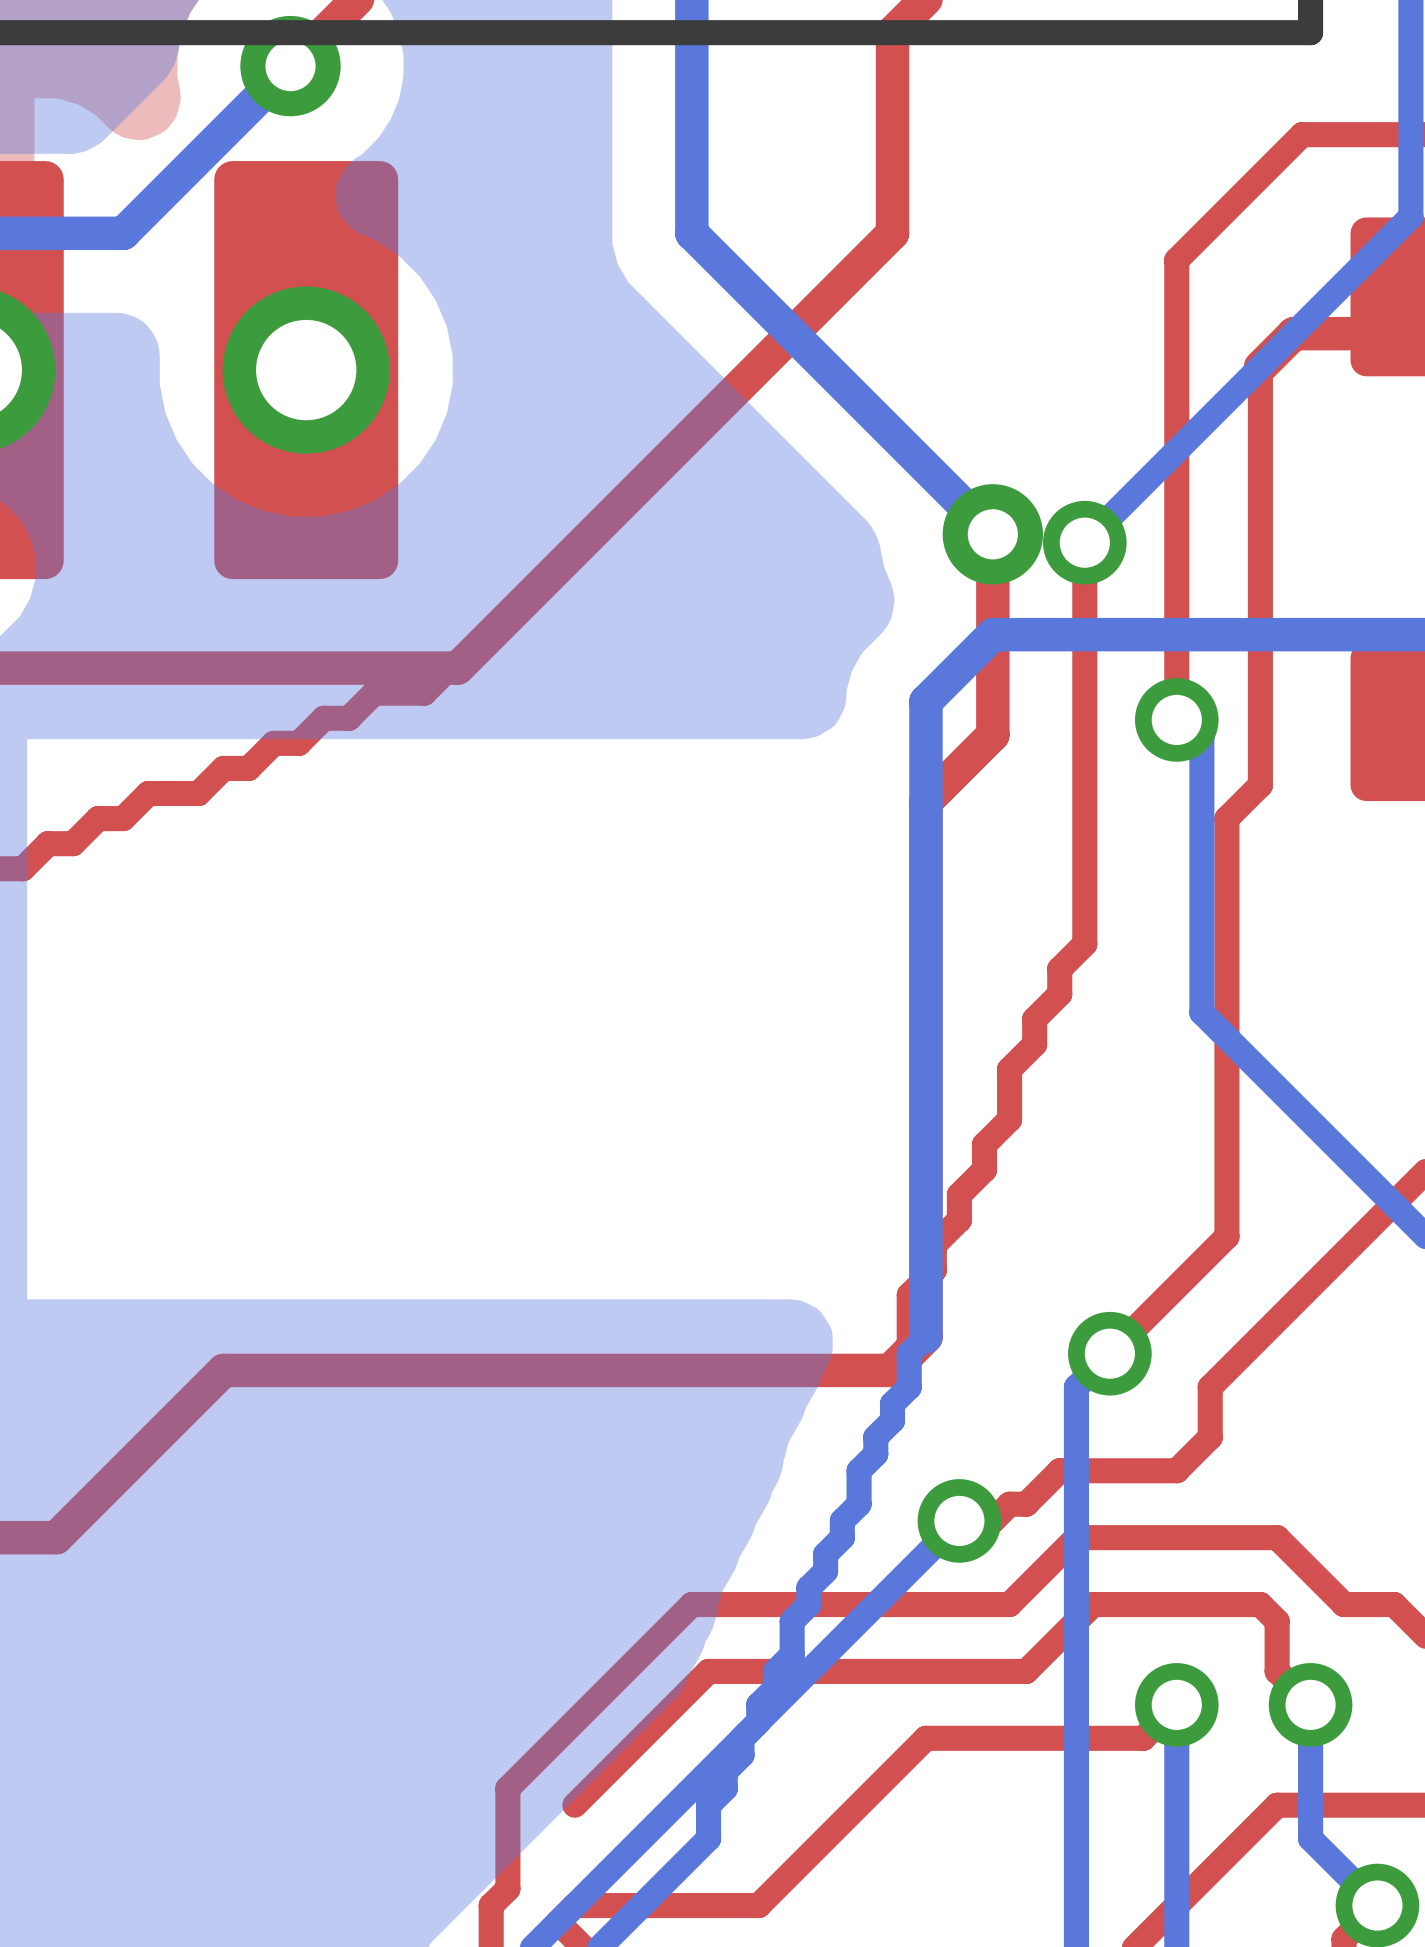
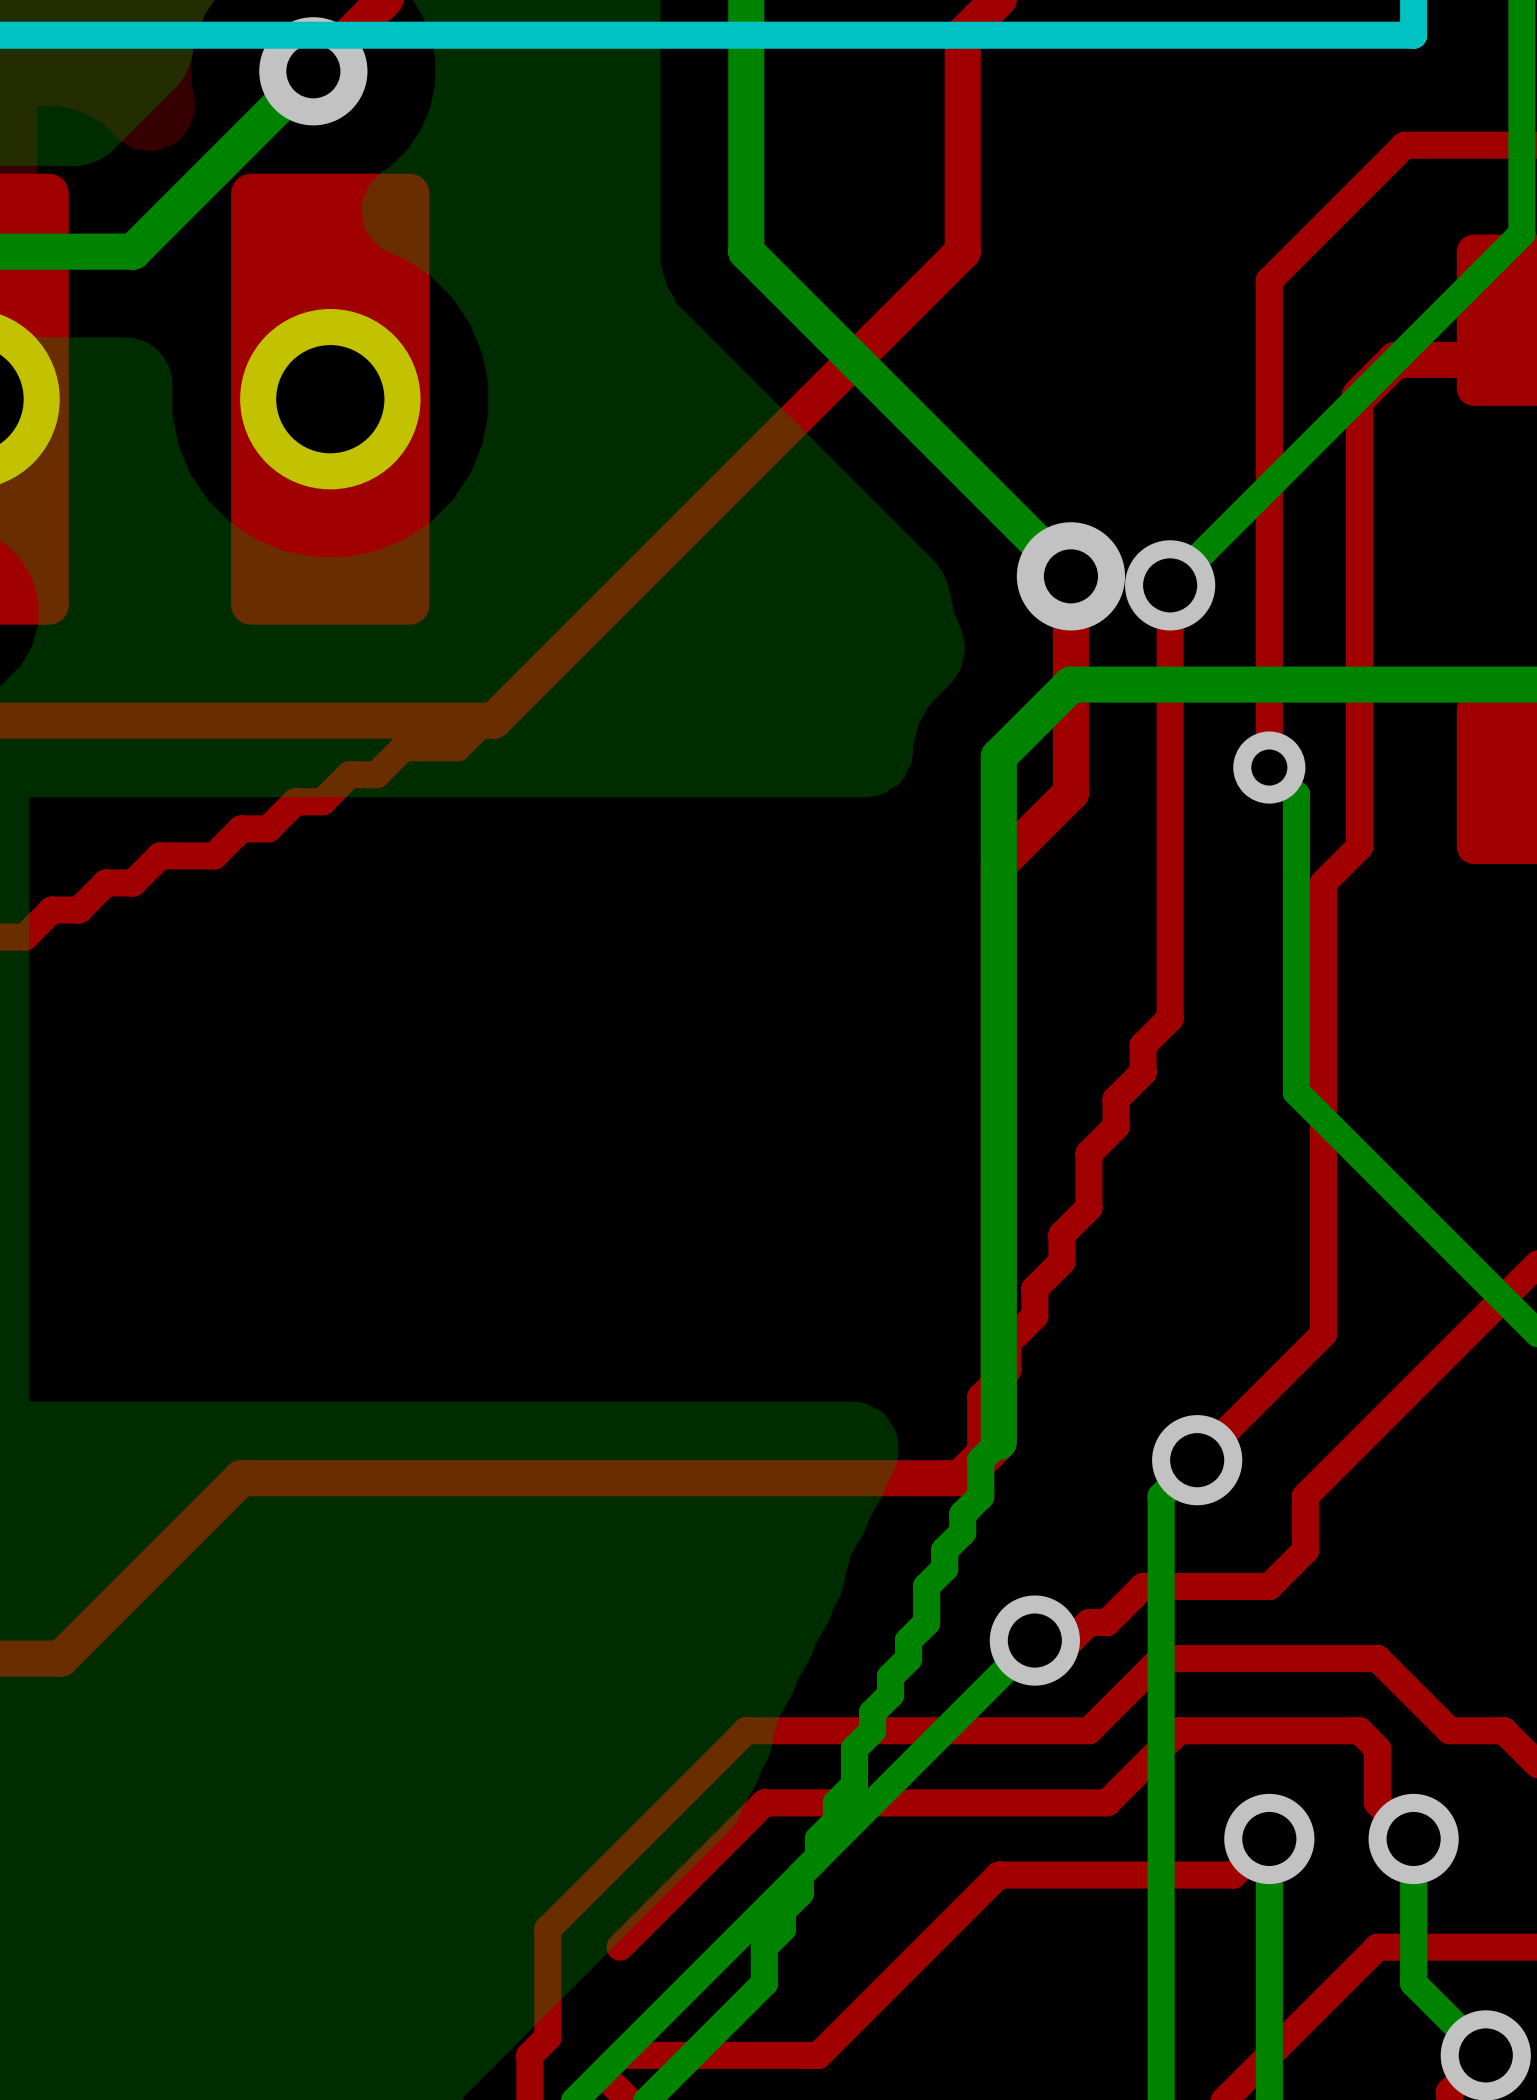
via size: [1134, 678, 1219, 762] -> [1233, 731, 1306, 804]

